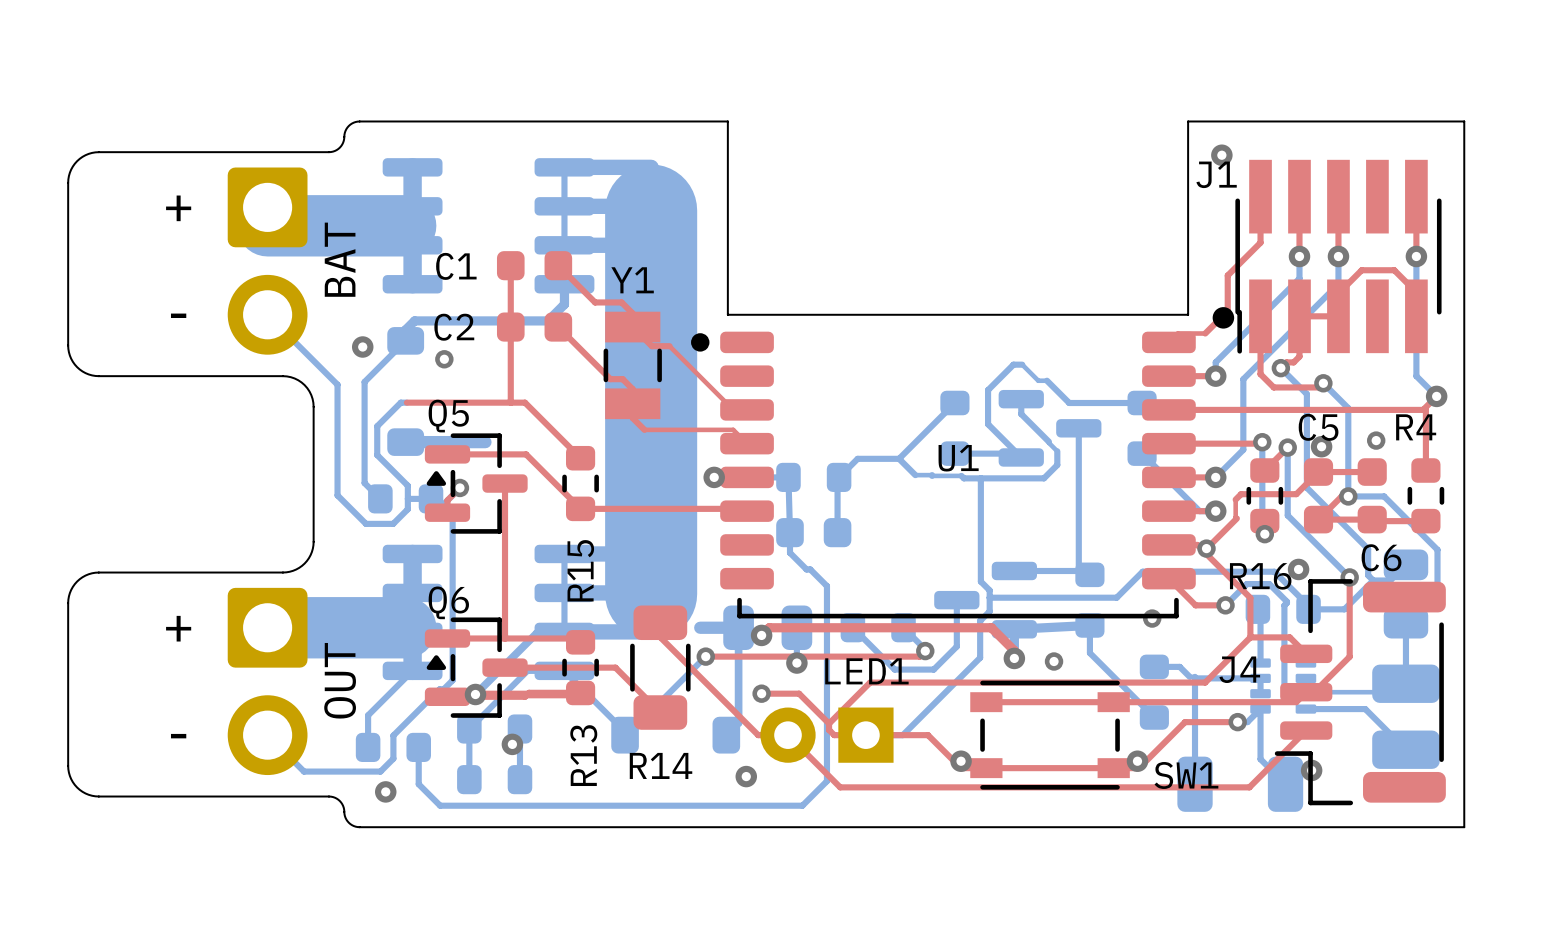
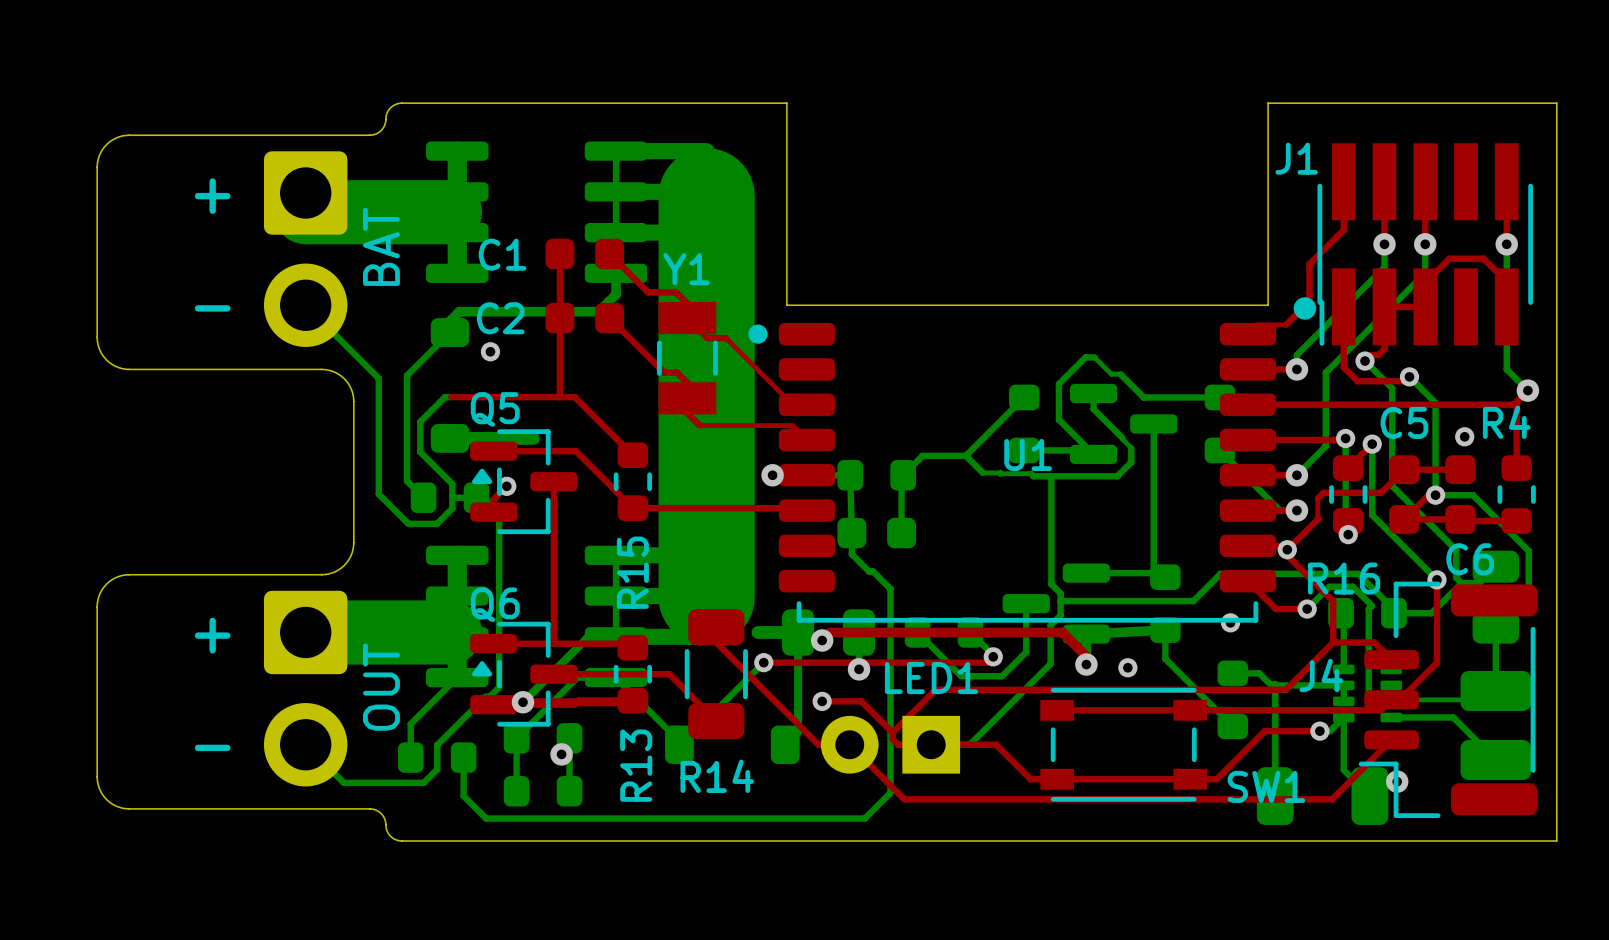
via: (1221, 155) -> none
via: (362, 347) -> none
via: (1321, 446) -> none
via: (1298, 569) -> none
via: (961, 761) -> none
via: (1137, 761) -> none
via: (746, 776) -> none
via: (385, 791) -> none

